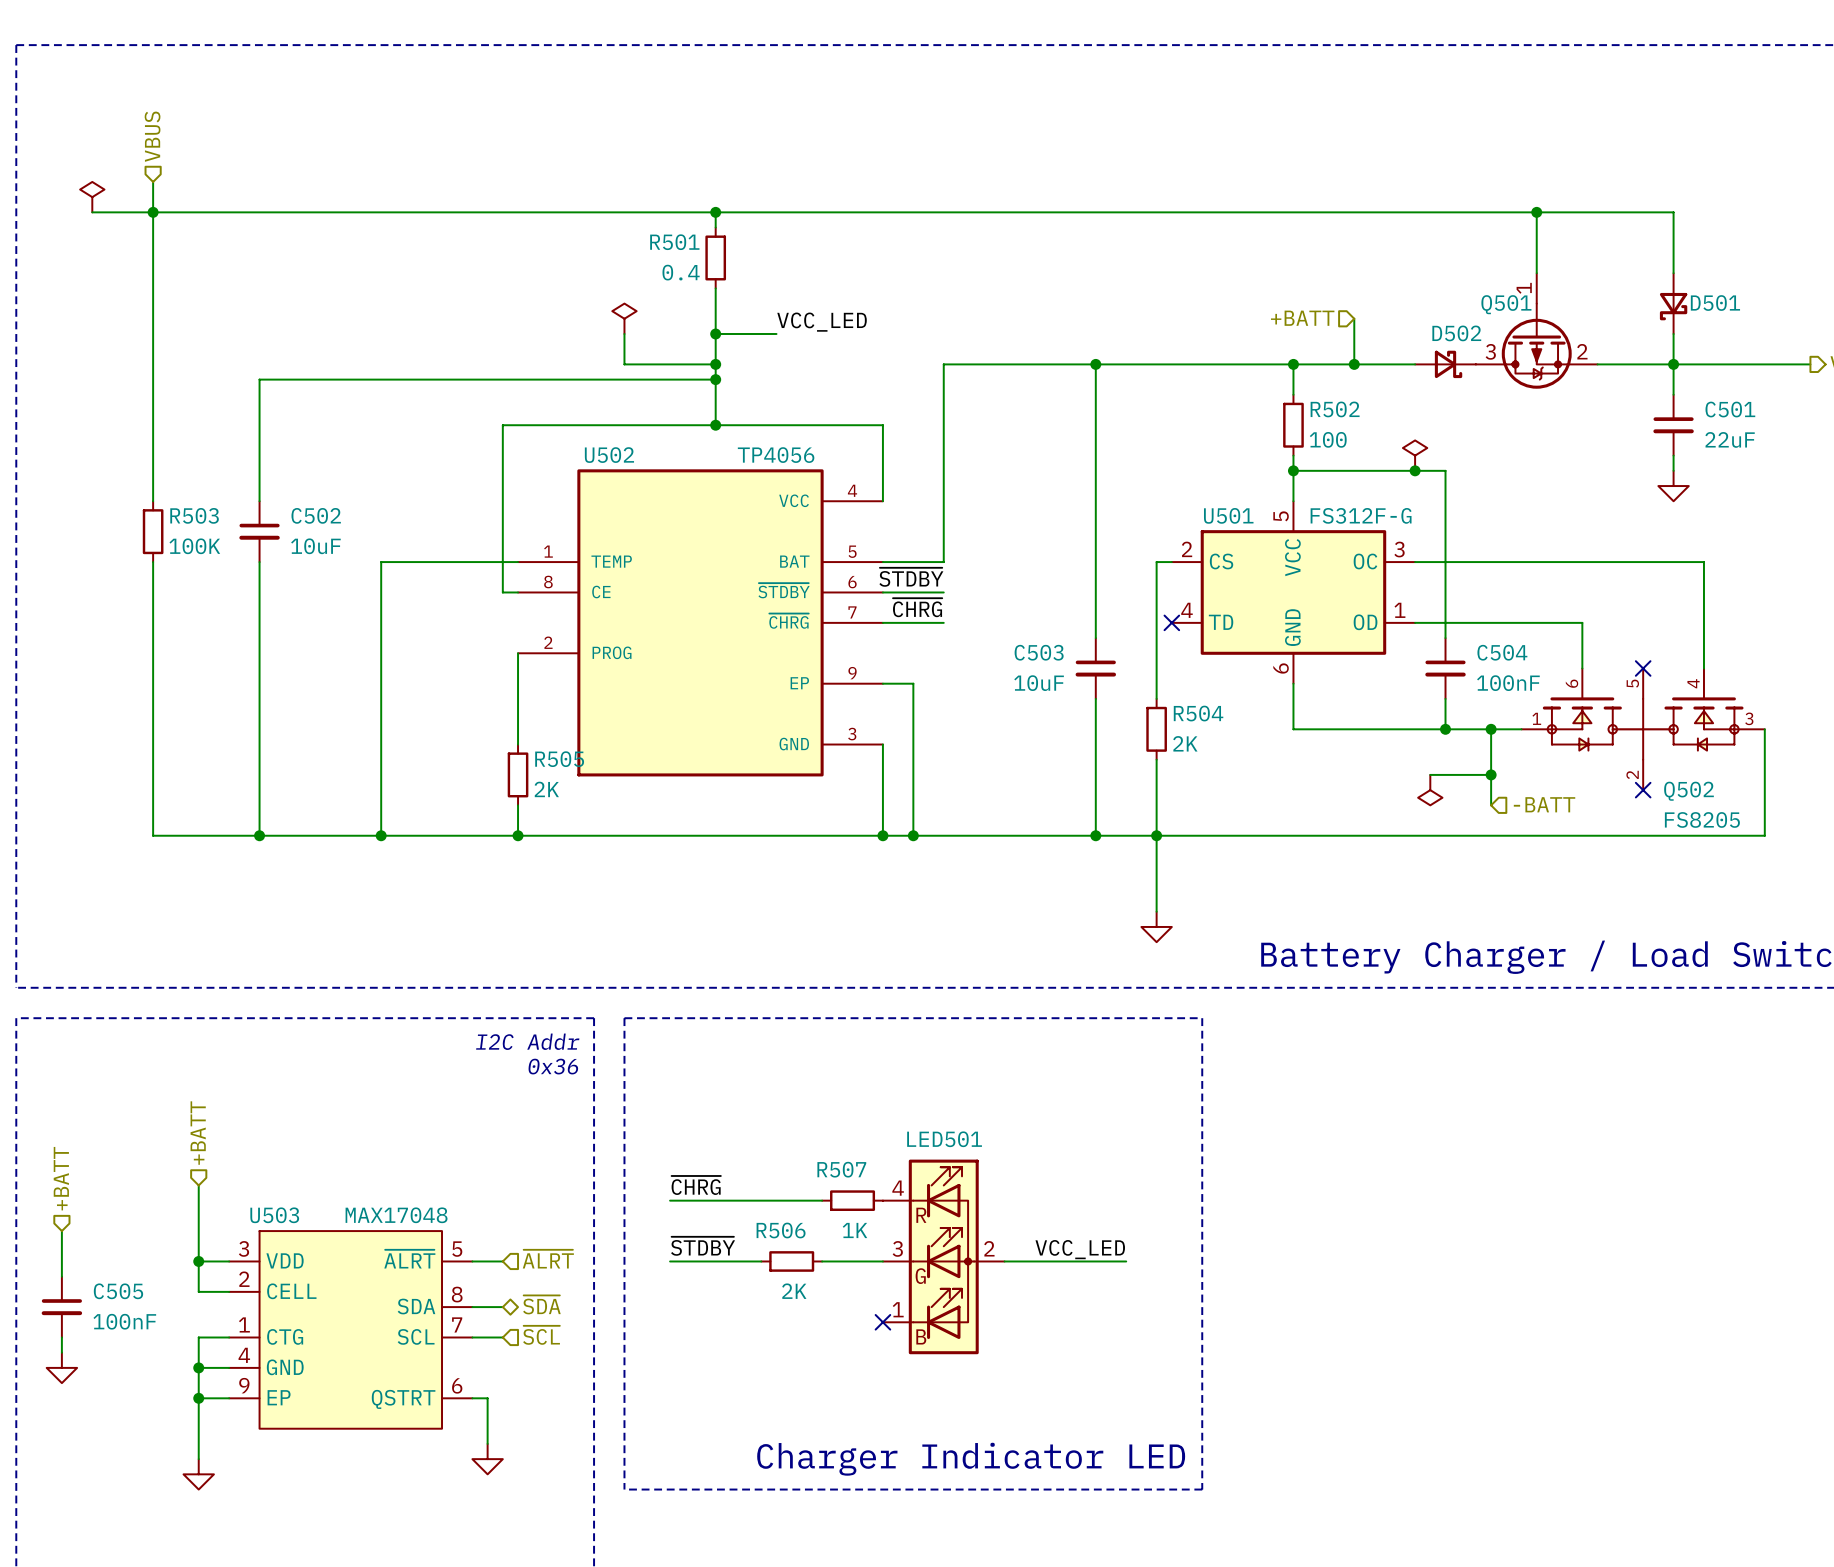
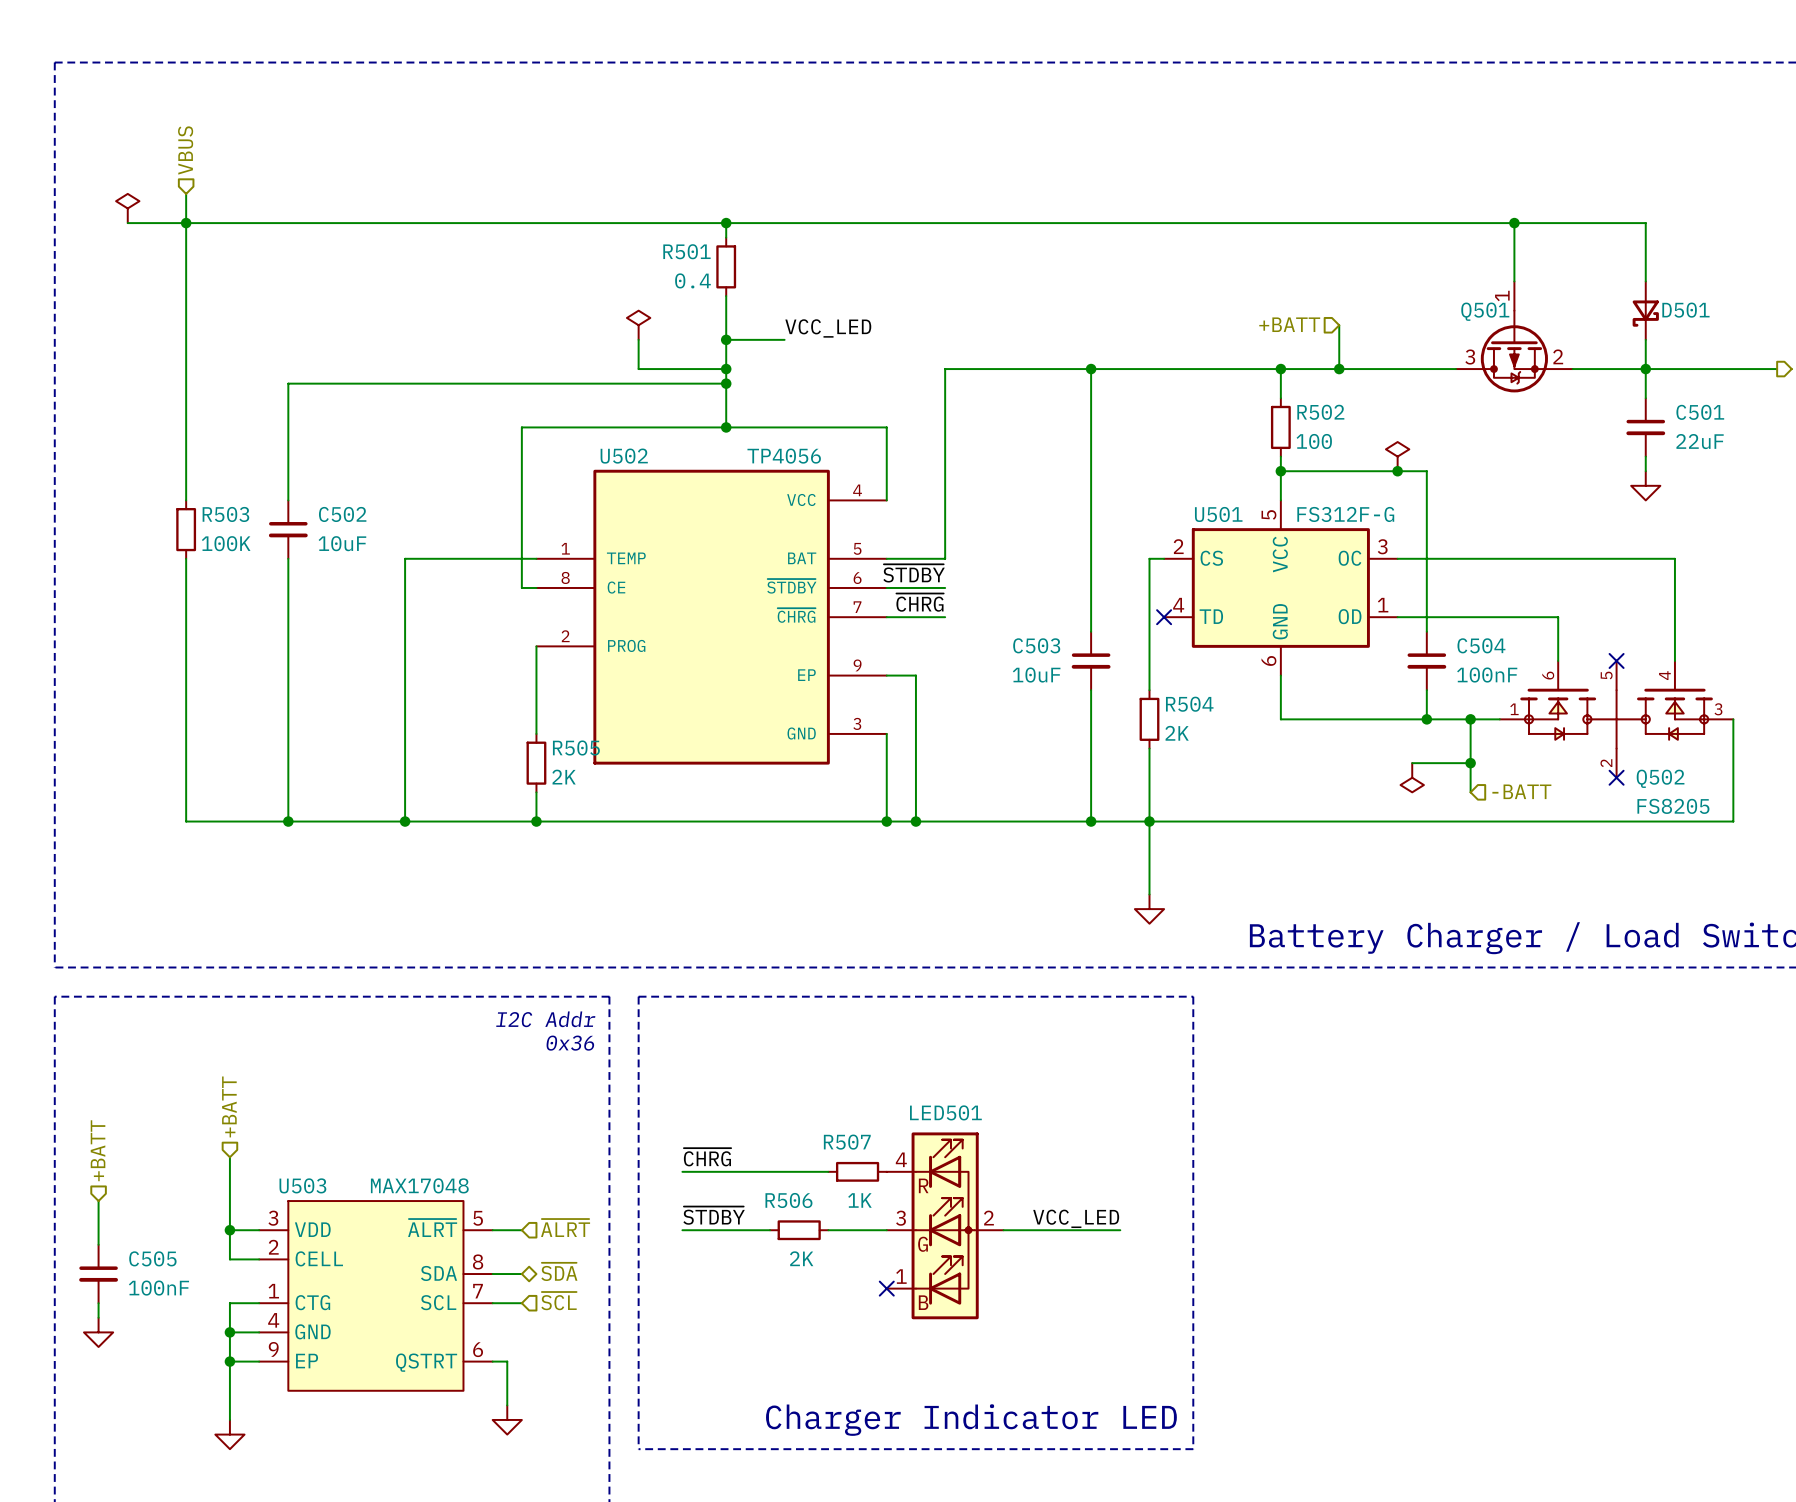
D502: (1445, 364) -> none

